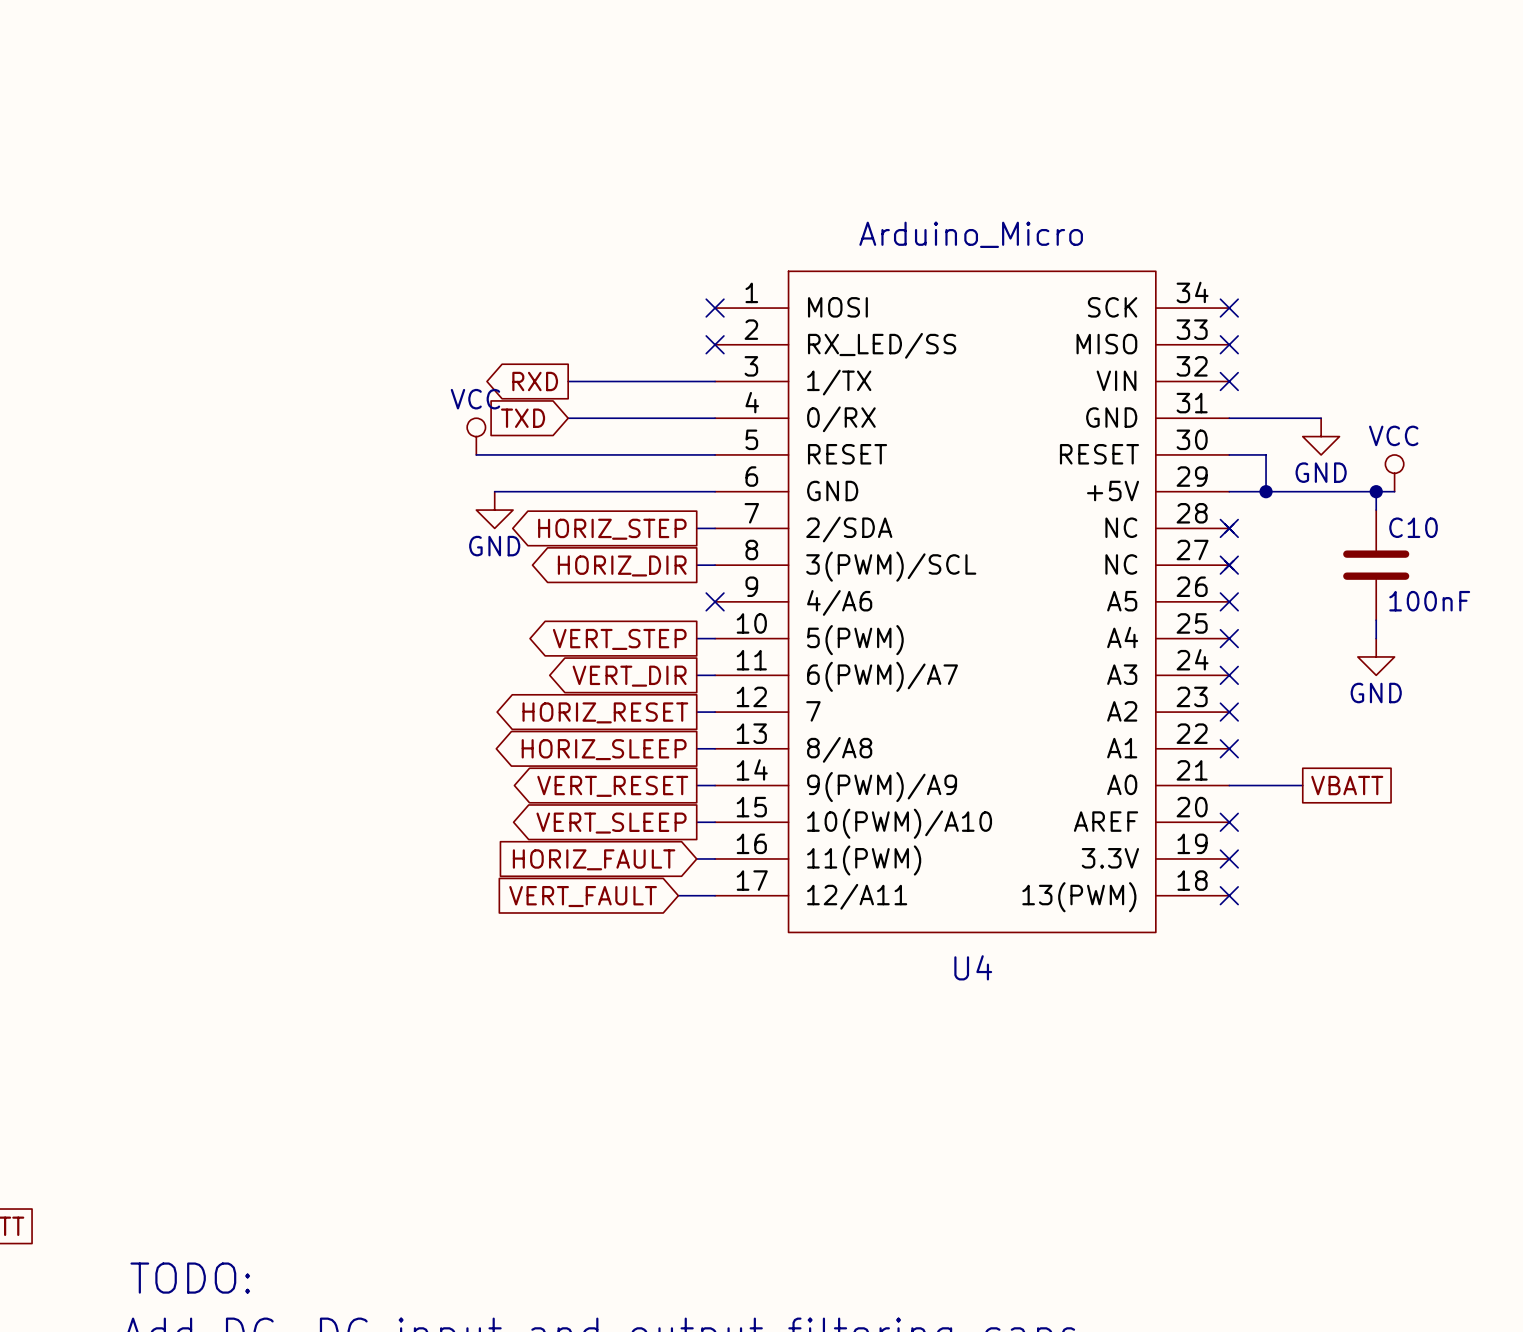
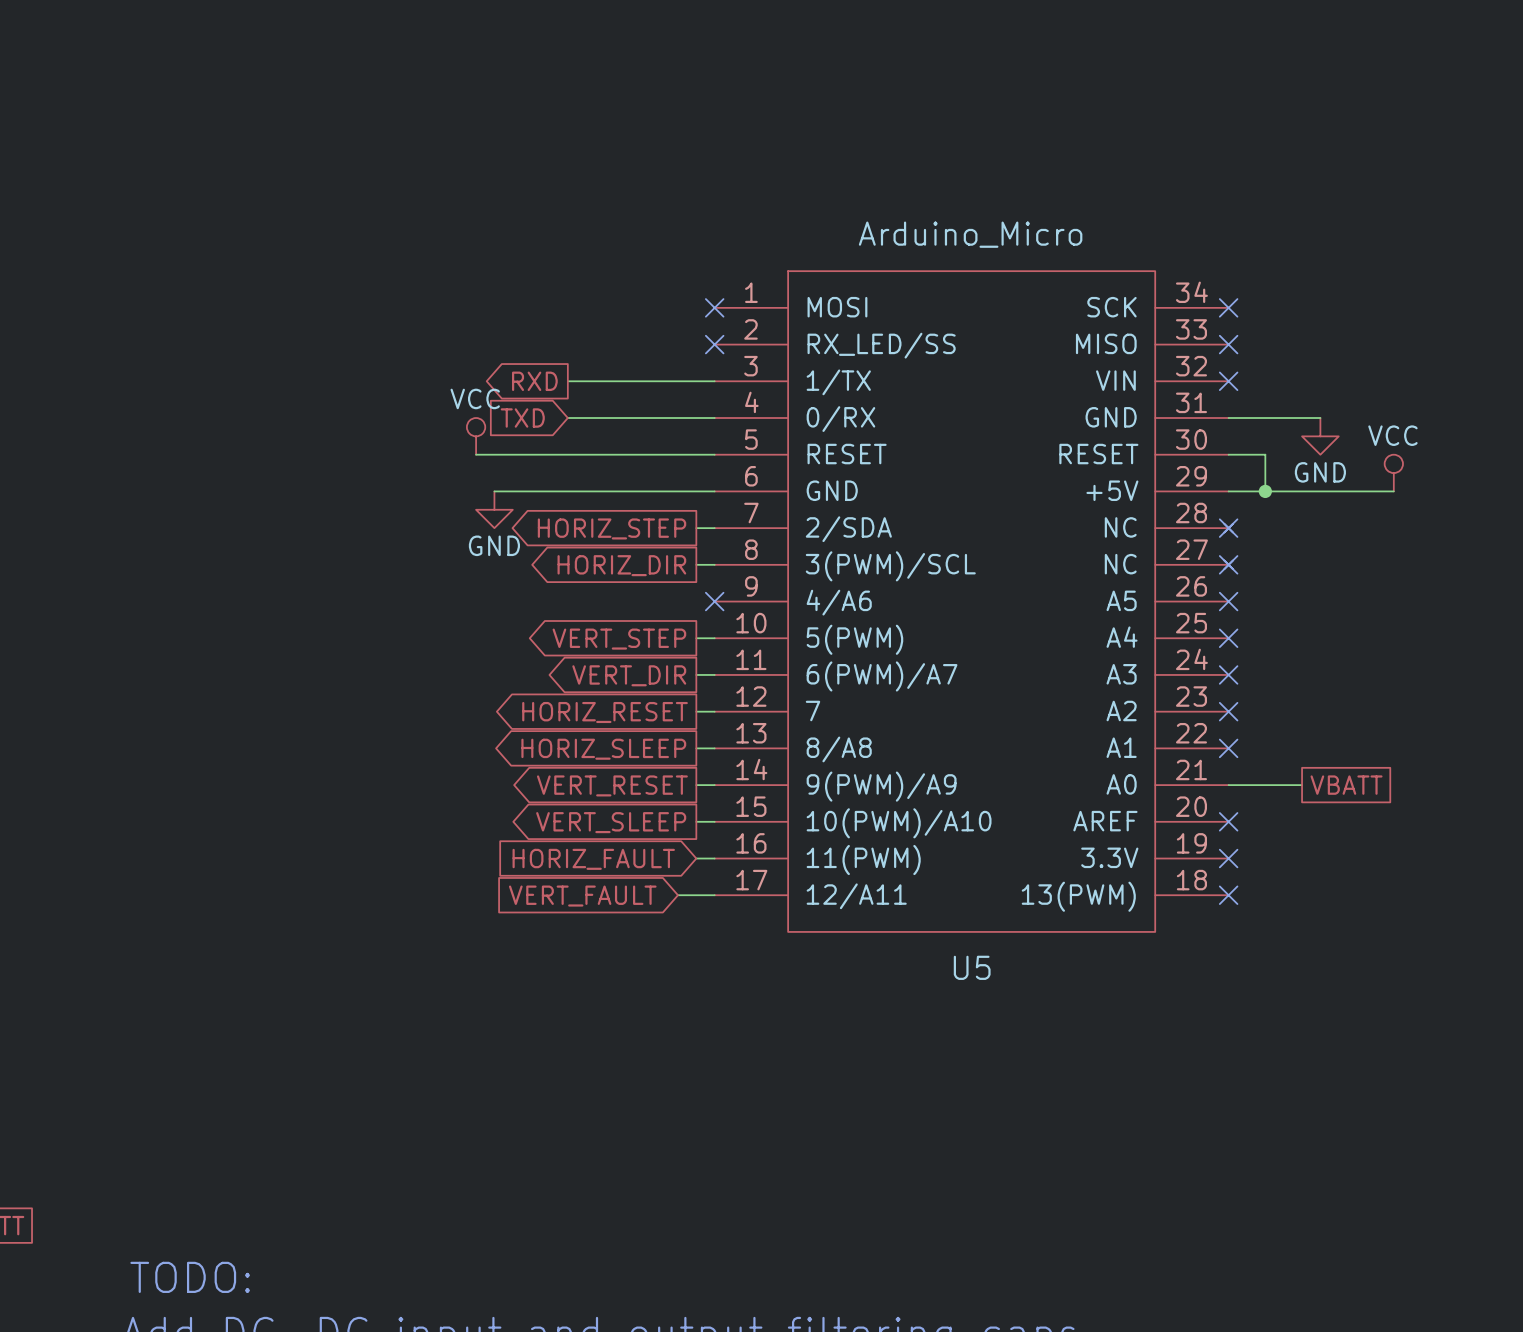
wire: (1376, 491) (1376, 510) -> none
junction: (1376, 491) -> none
C10: 100nF (1376, 565) -> none
wire: (1376, 620) (1376, 638) -> none
power symbol: GND (1376, 656) -> none
U4 name: U4 (973, 967) -> U5 (972, 967)

